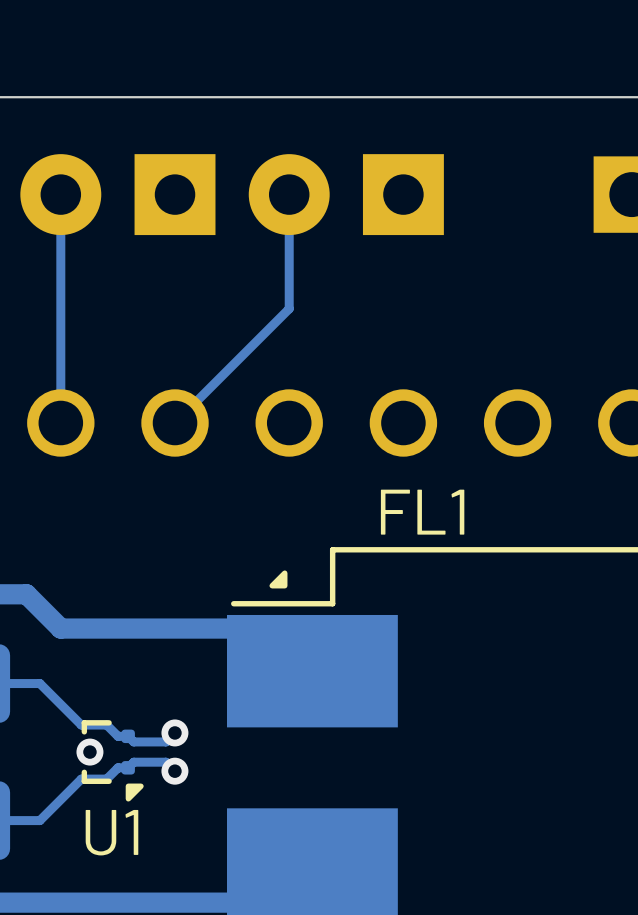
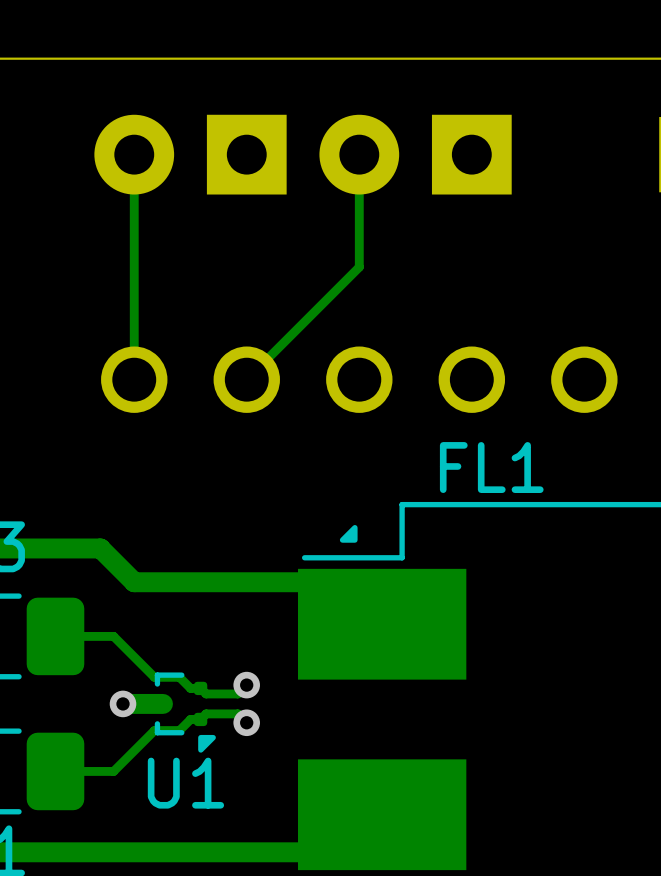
track: none -> (162, 703) (123, 703)
via position: (89, 752) -> (123, 703)

